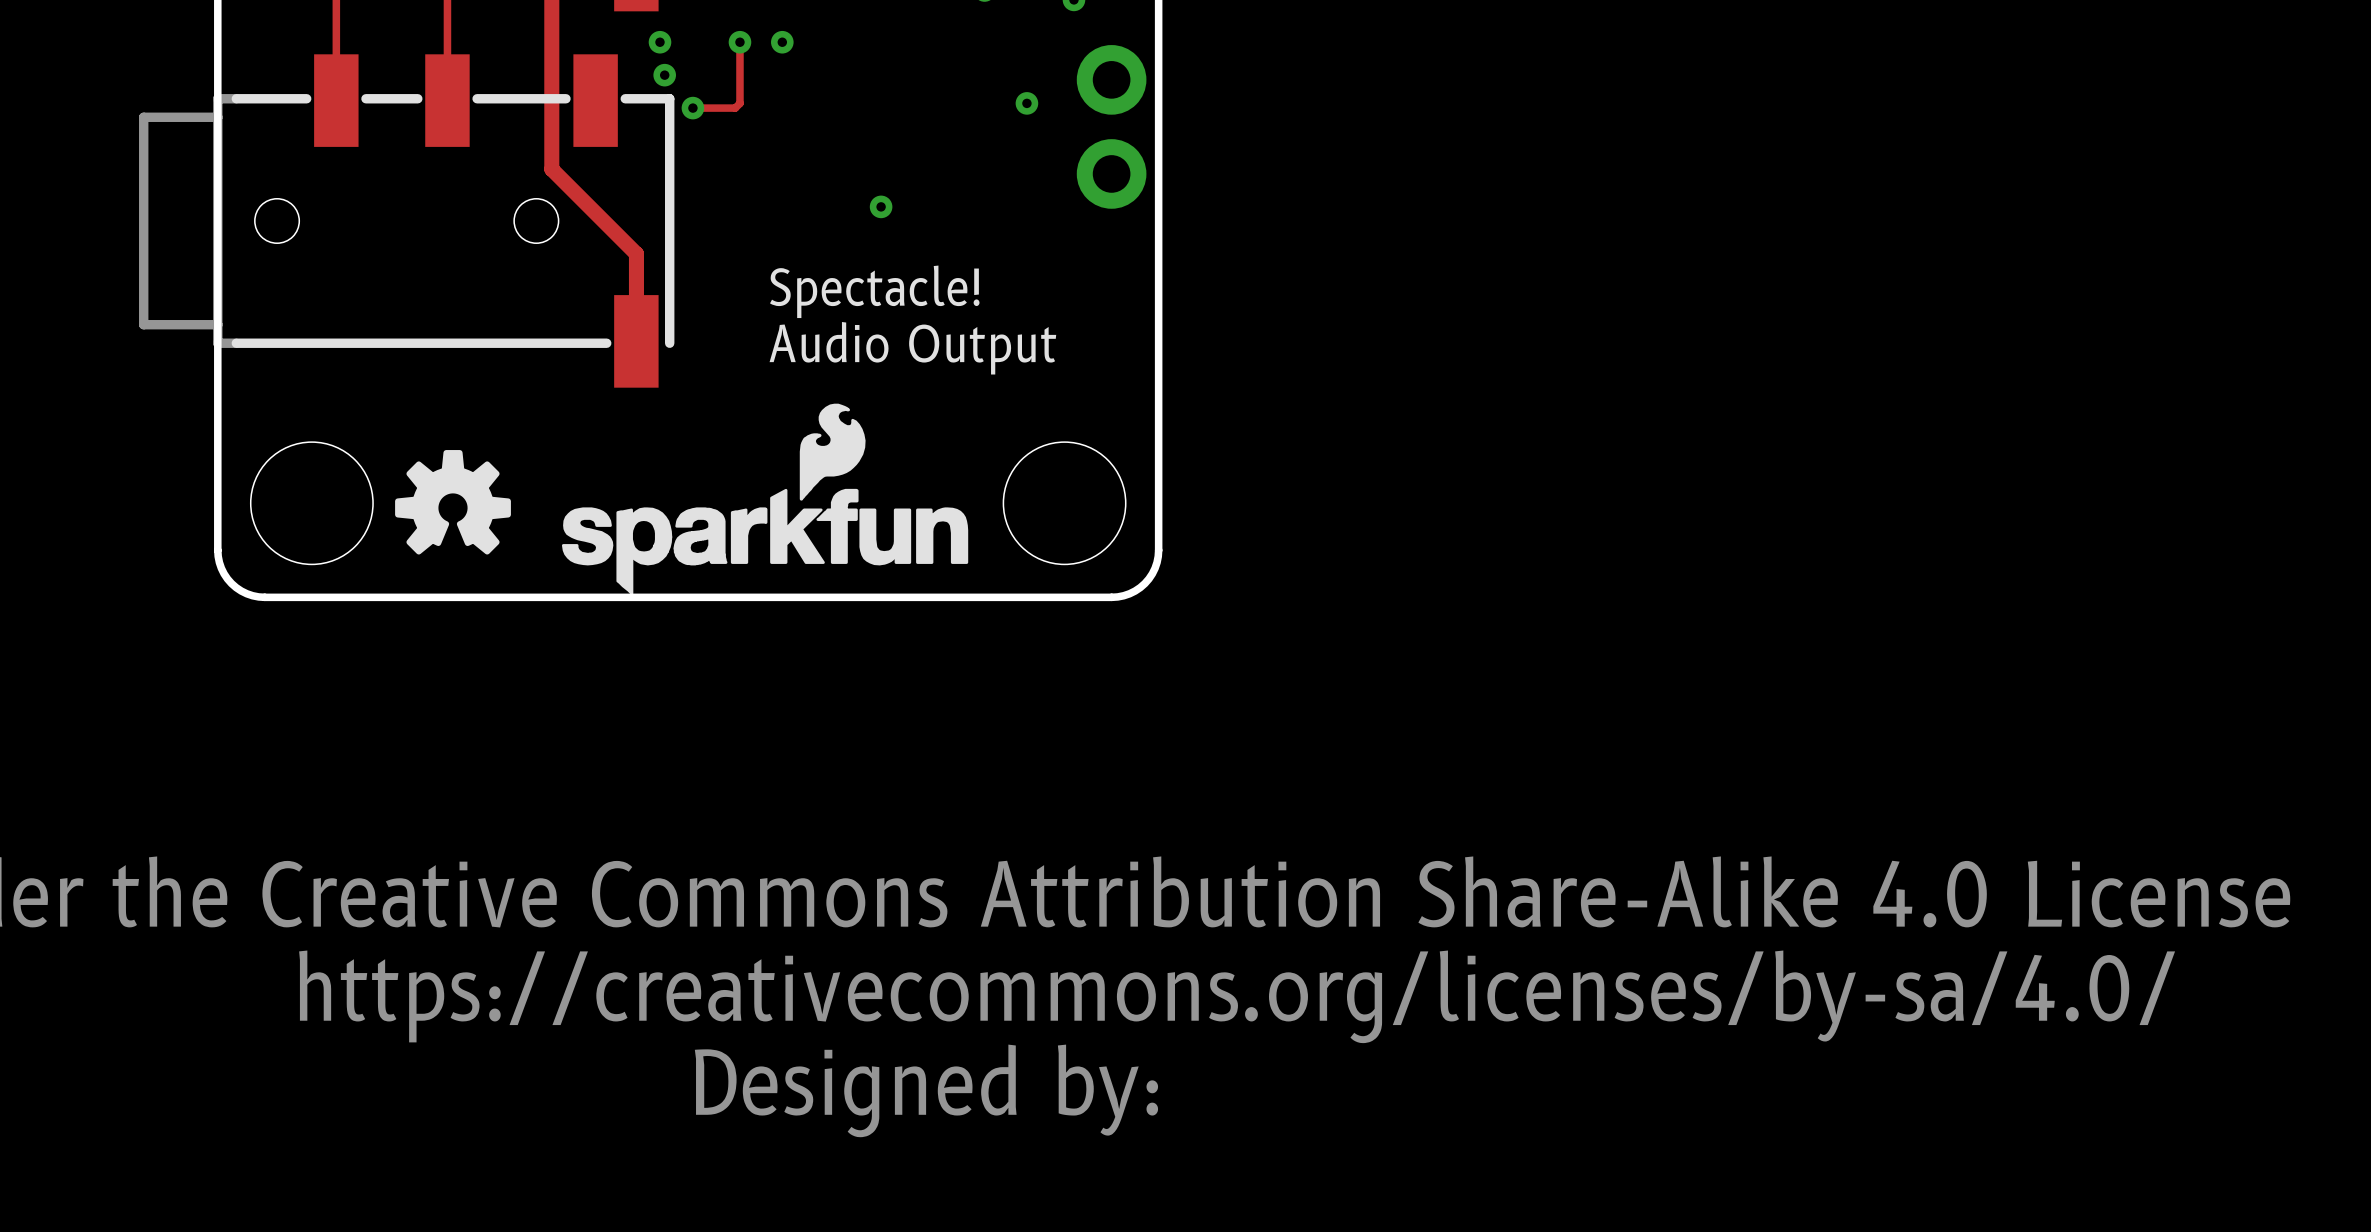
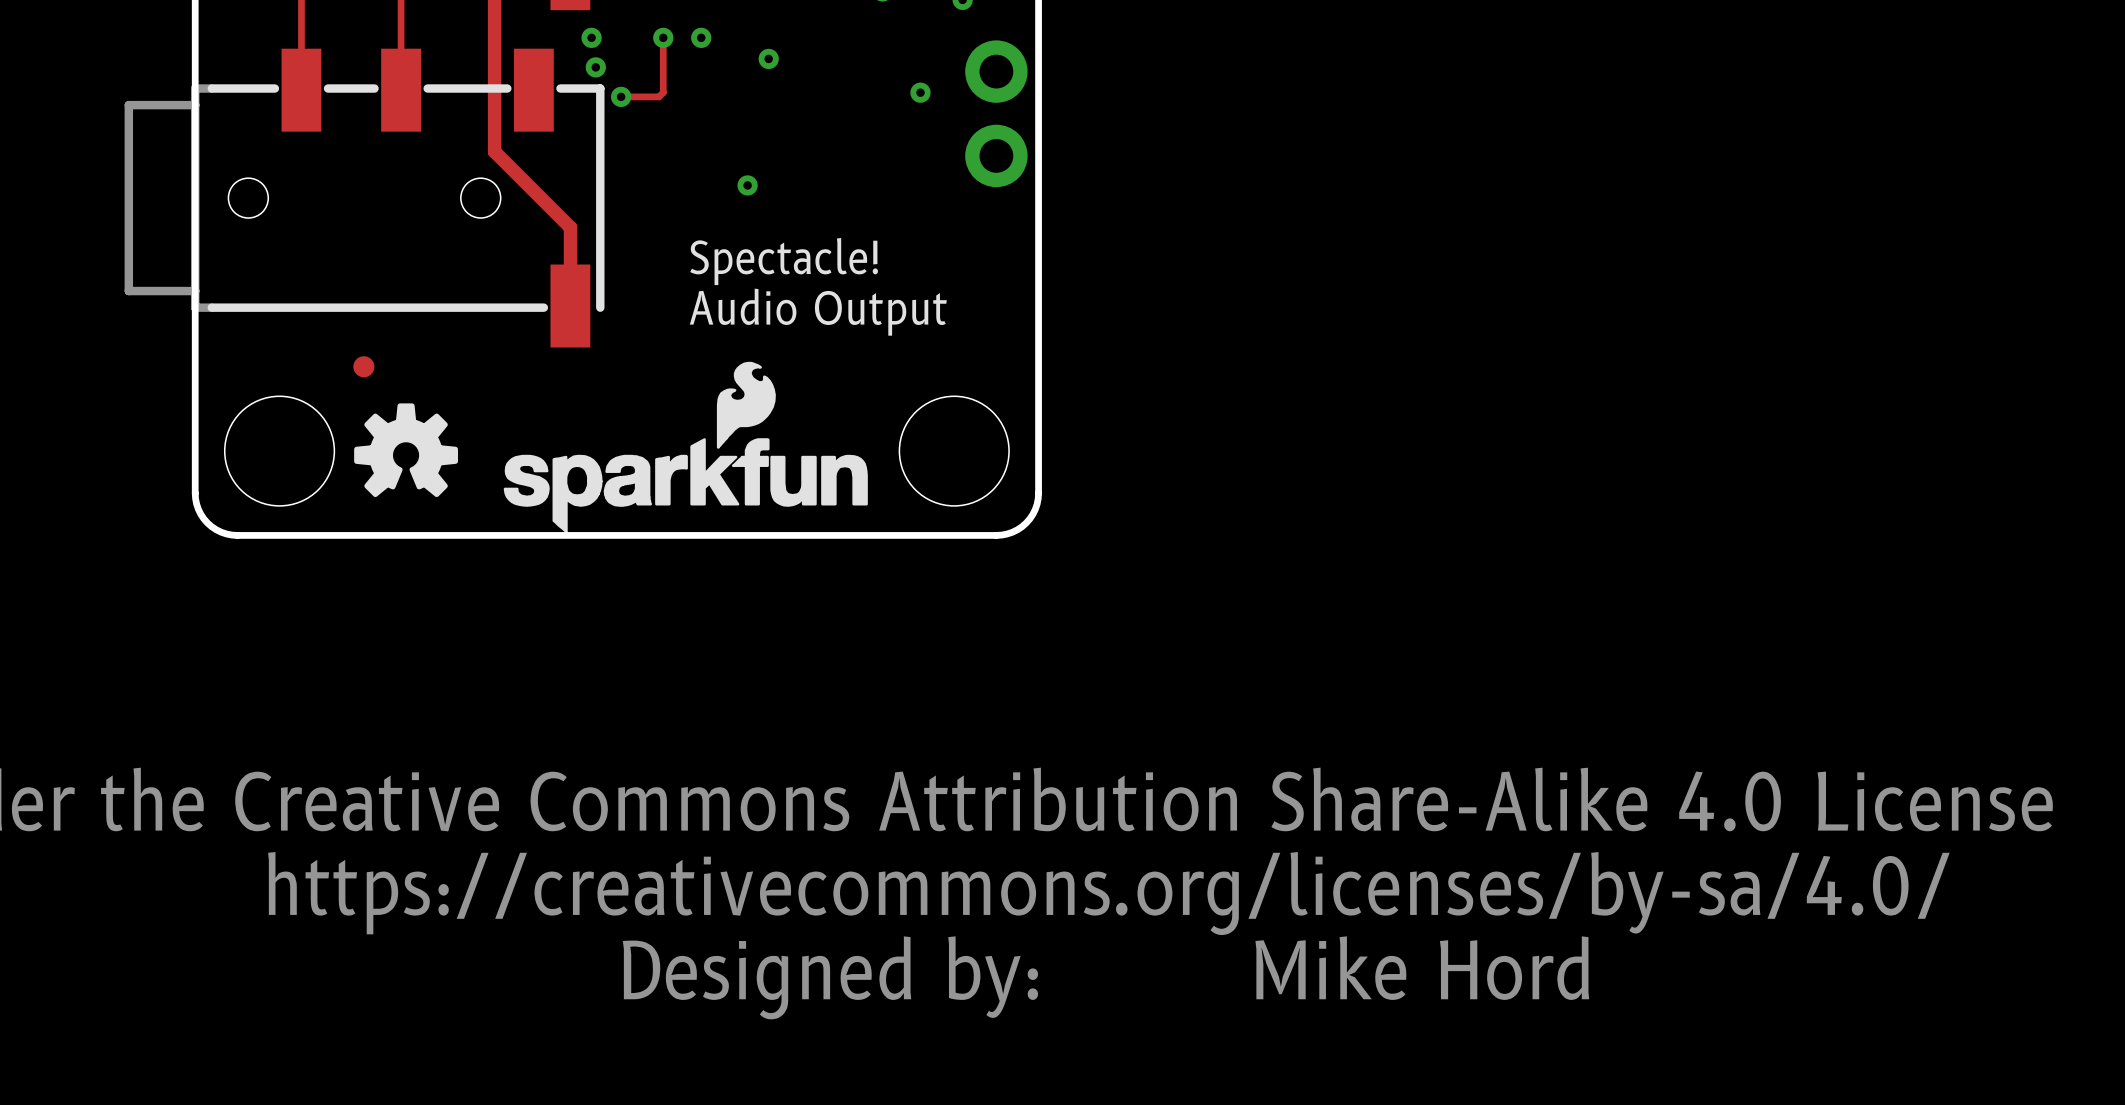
via: none -> (768, 58)
via position: (881, 206) -> (747, 185)
part: none -> (363, 366)
text: none -> Mike Hord (1422, 968)

